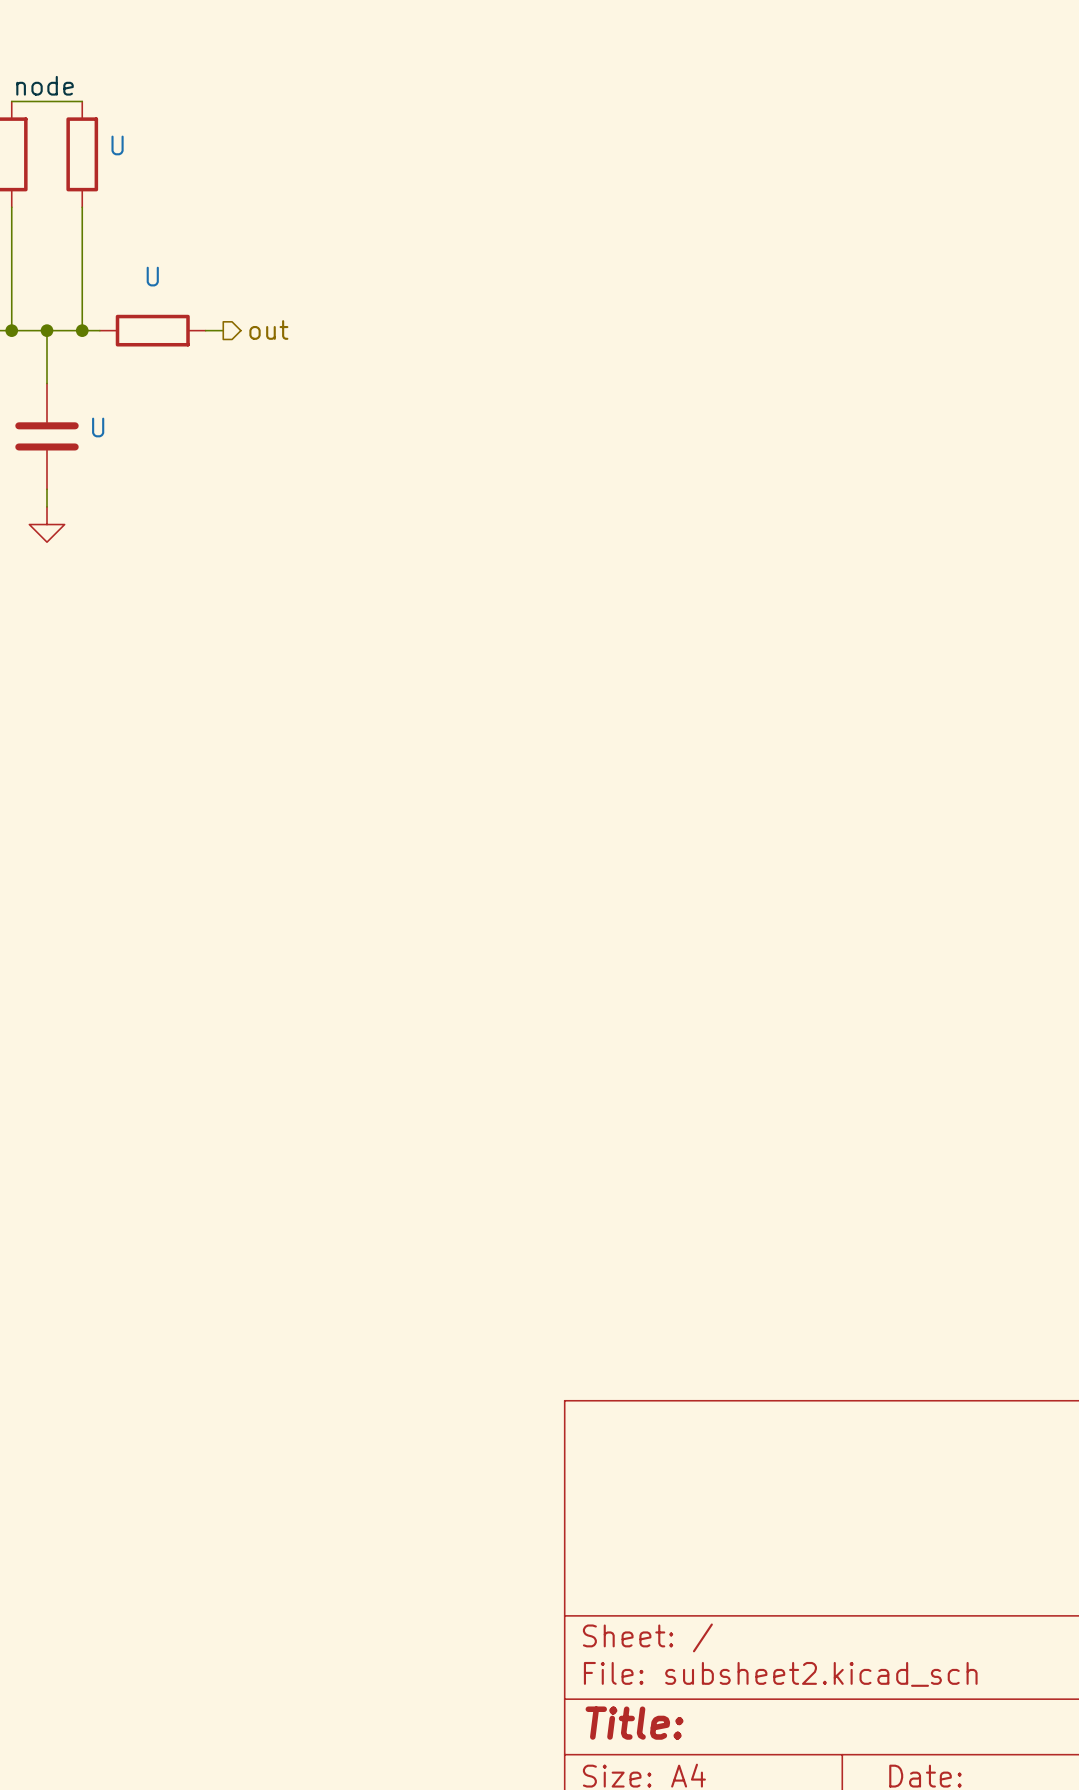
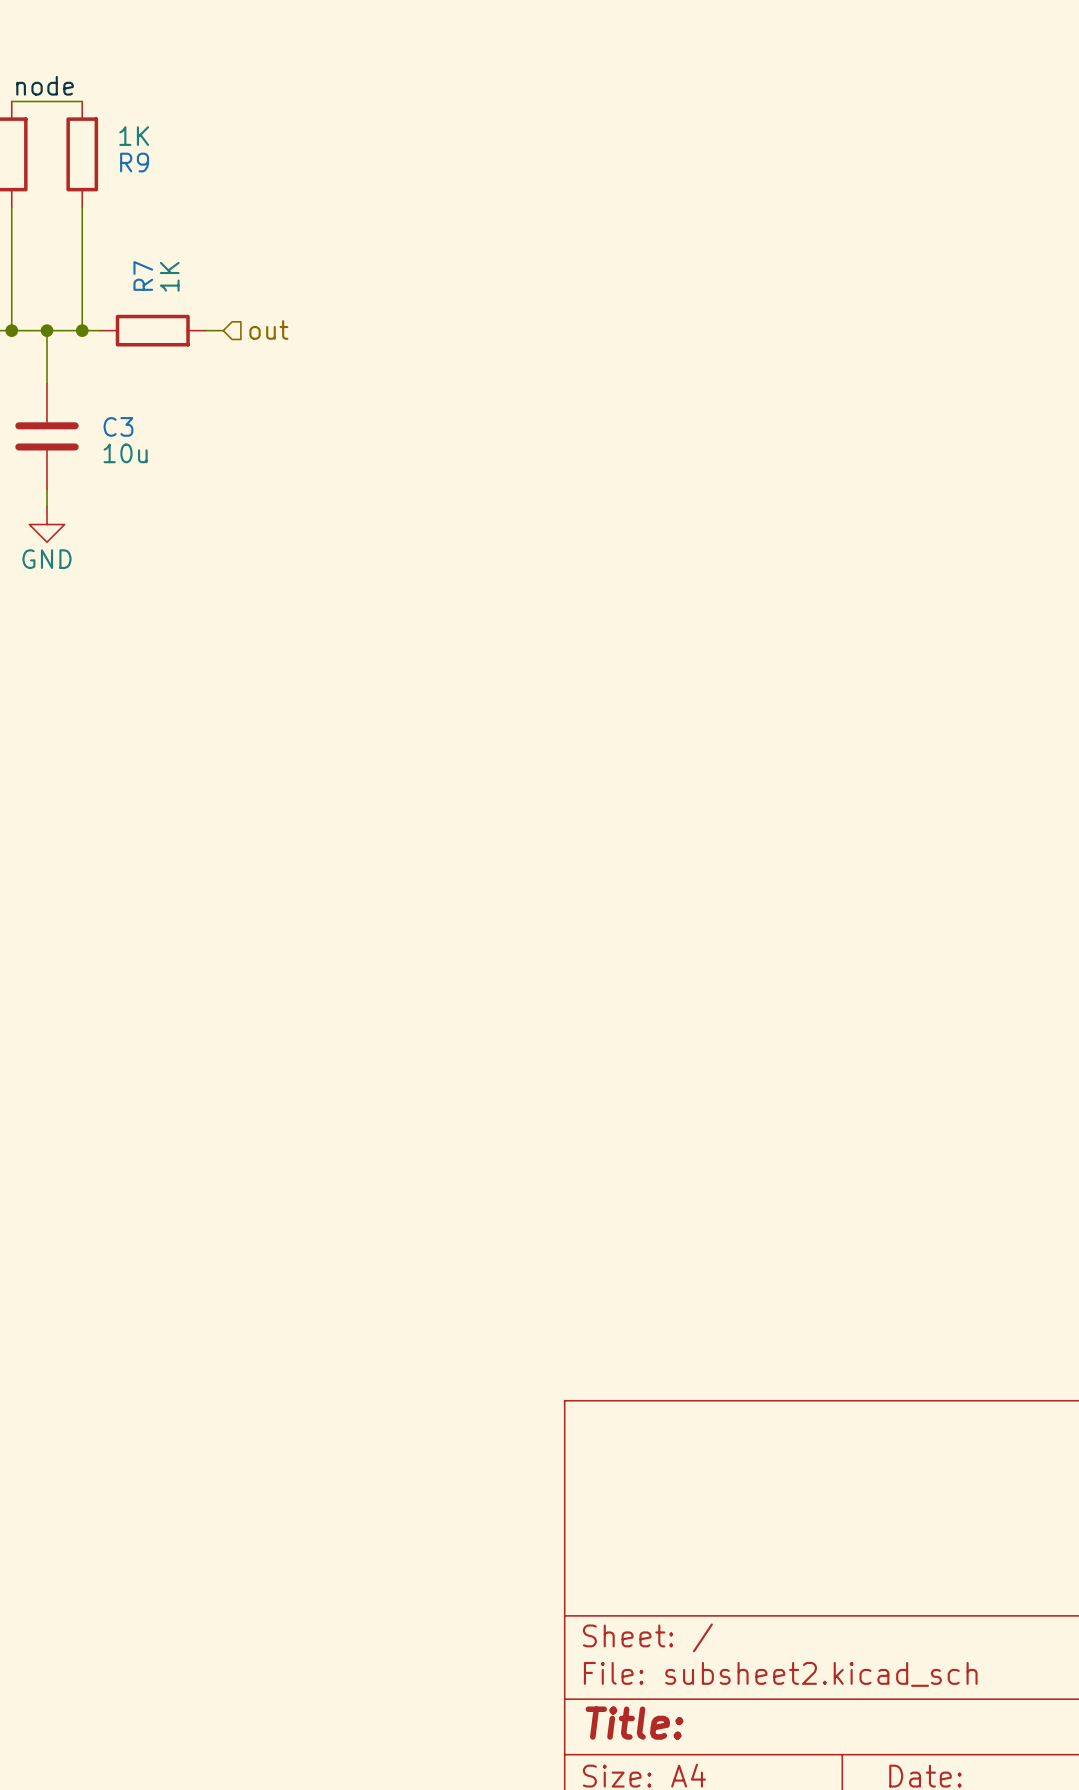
U value: none -> 1K (134, 136)
U name: U (117, 145) -> R9 (134, 162)
U name: U (152, 276) -> R7 (143, 275)
U value: none -> 1K (169, 276)
hierarchical label shape: output (268, 329) -> input (268, 329)
U name: U (98, 427) -> C3 (118, 426)
U value: none -> 10u (125, 453)
power symbol text: none -> GND (46, 559)

